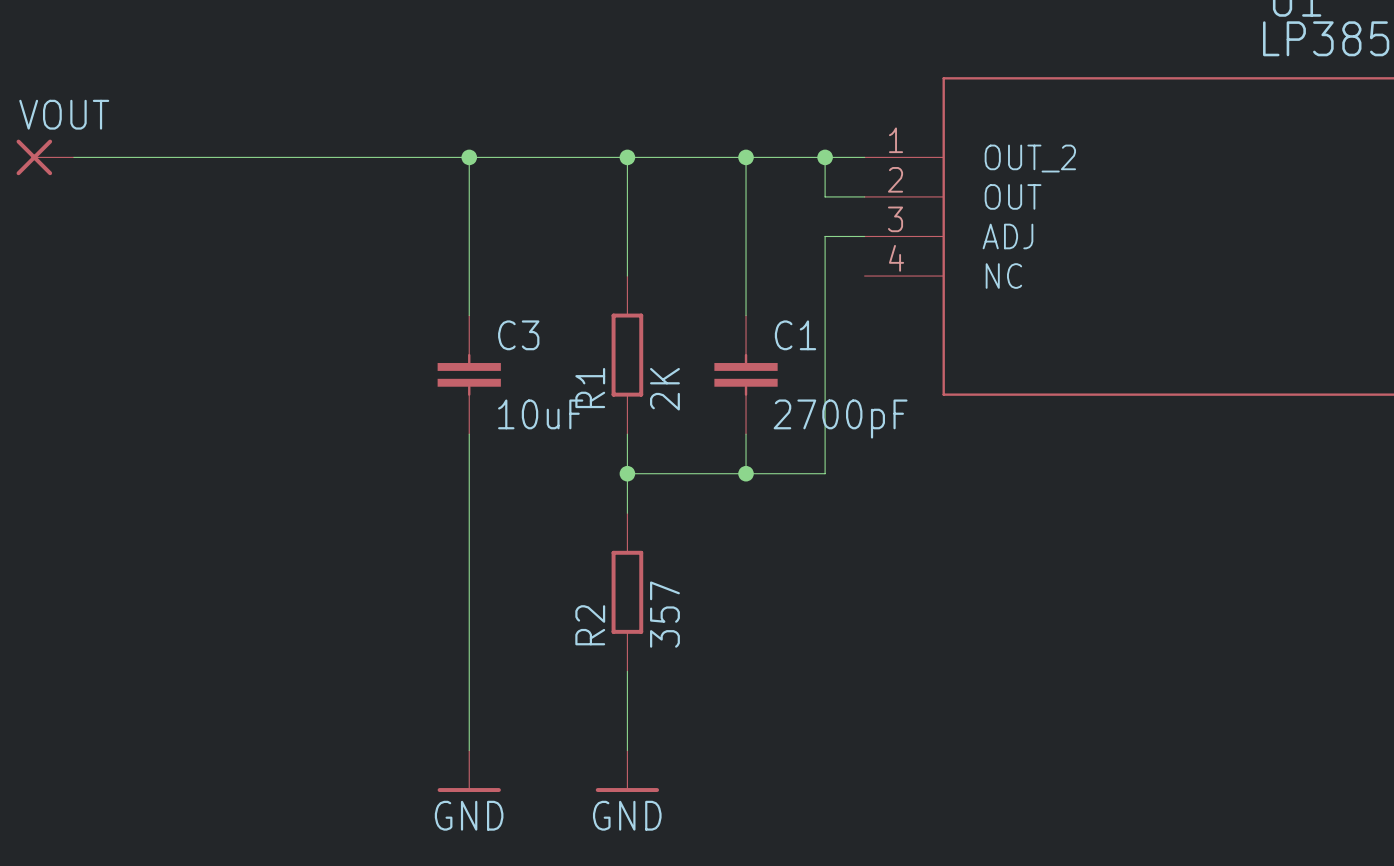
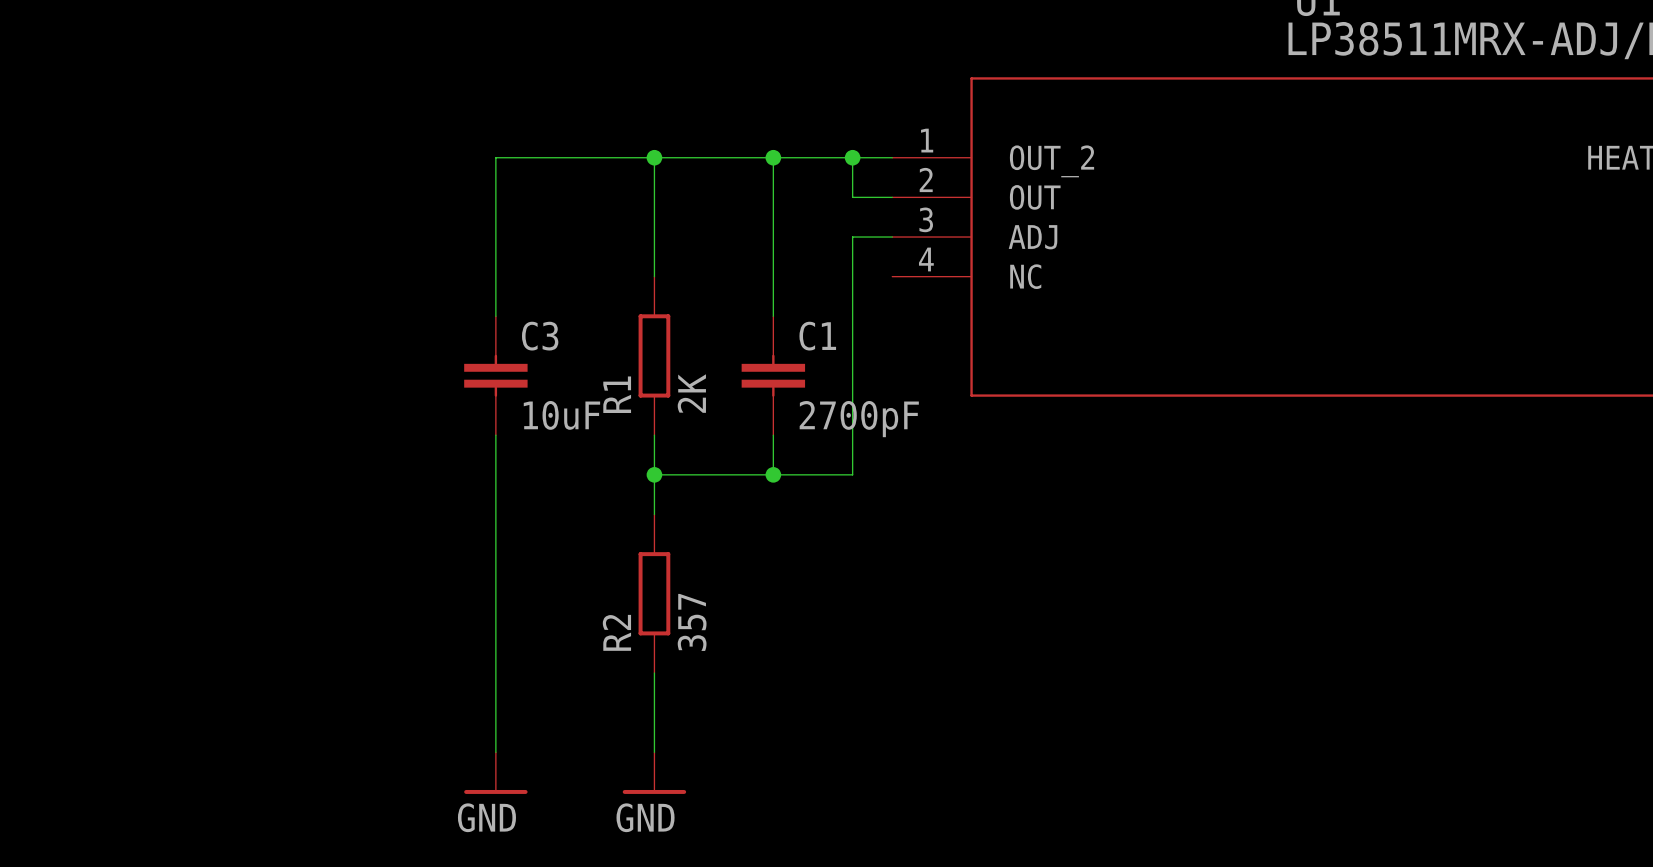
VOUT: (45, 157) -> none
wire: (73, 157) (469, 157) -> none
junction: (469, 157) -> none

